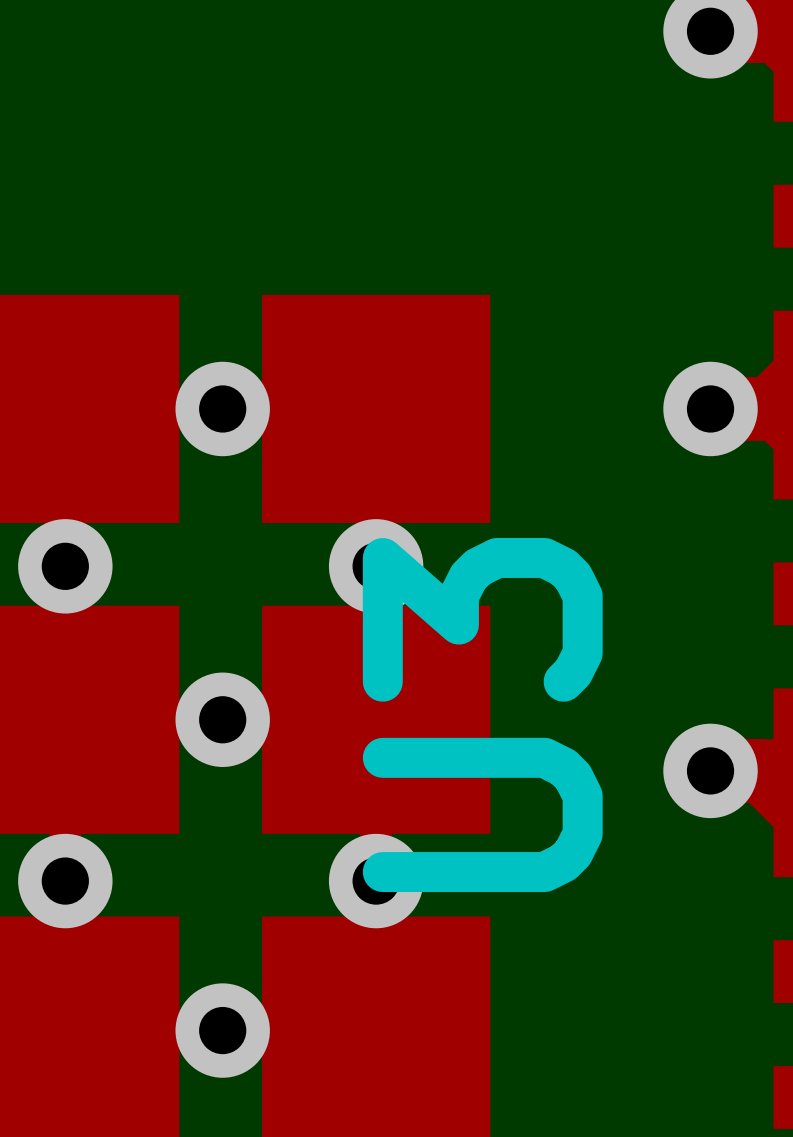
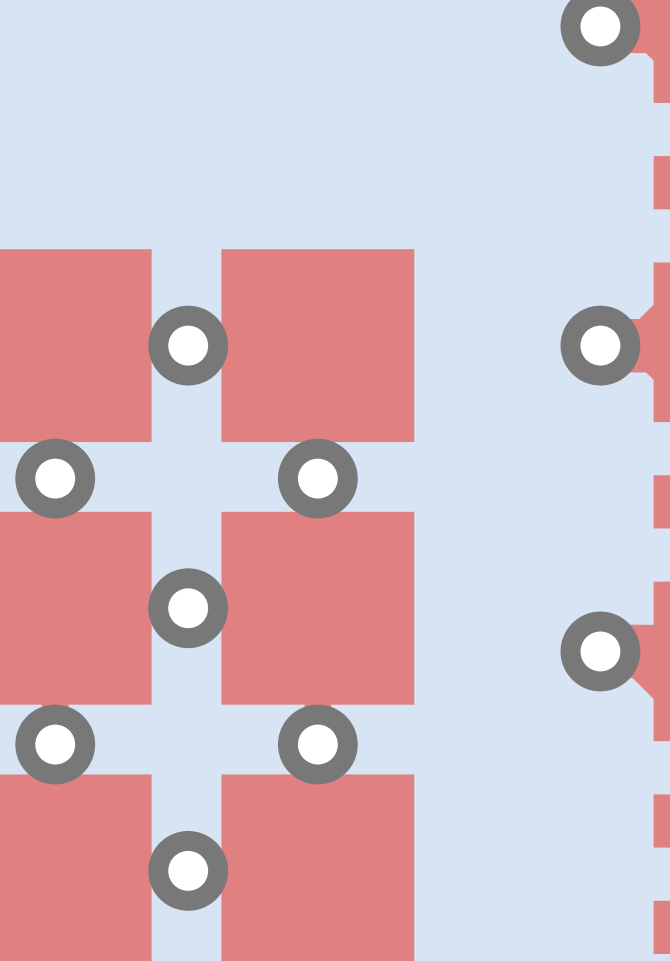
U3 name: U3 (482, 715) -> none

